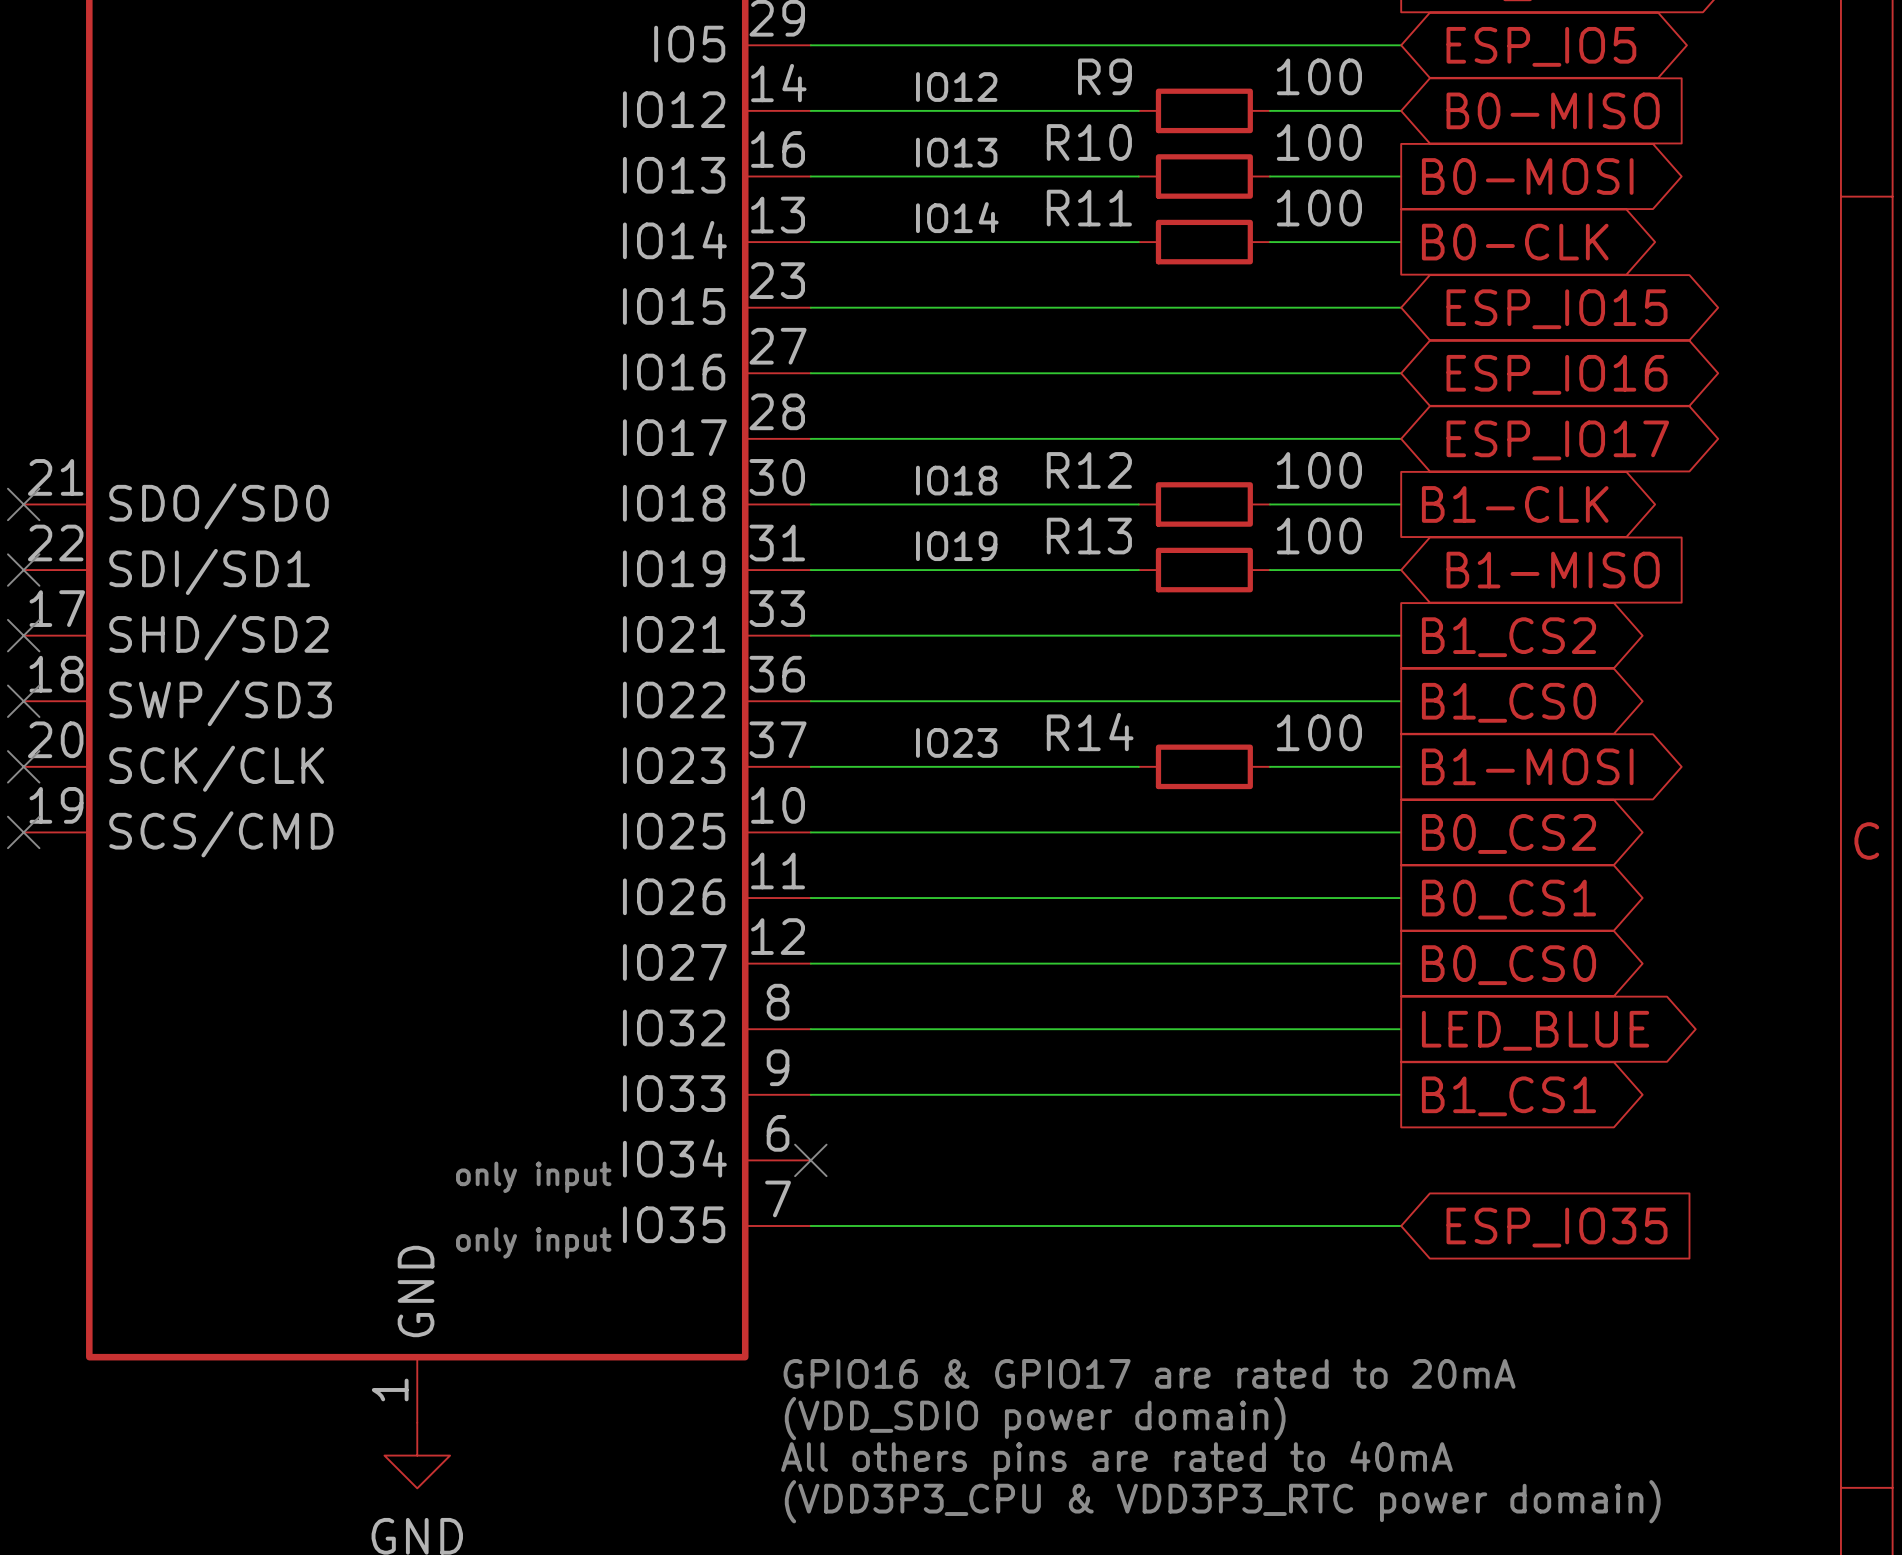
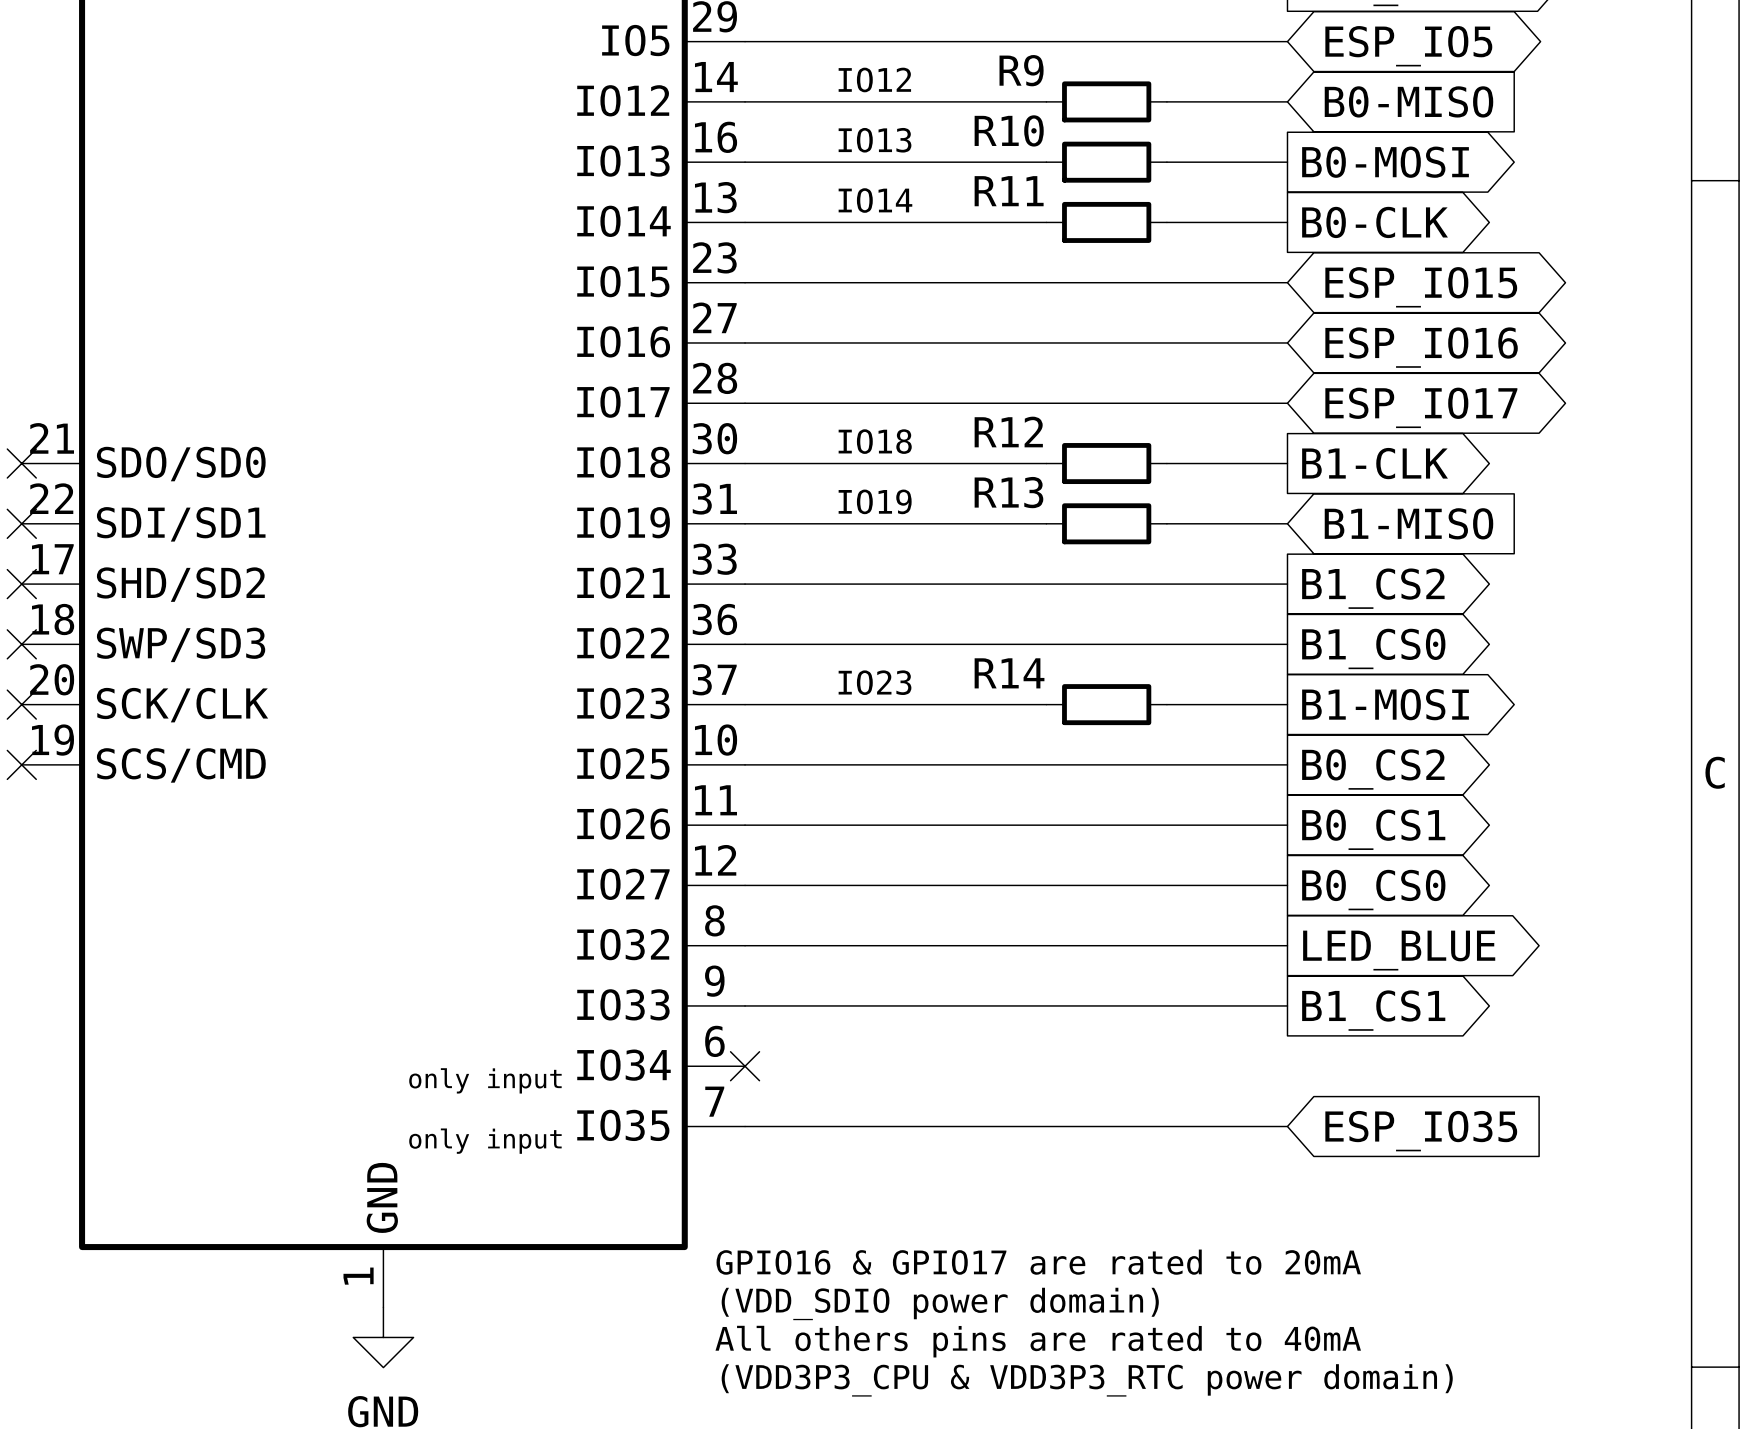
R9 value: 100 (1319, 76) -> none
R10 value: 100 (1319, 142) -> none
R11 value: 100 (1319, 208) -> none
R12 value: 100 (1319, 470) -> none
R13 value: 100 (1319, 536) -> none
R14 value: 100 (1319, 732) -> none

